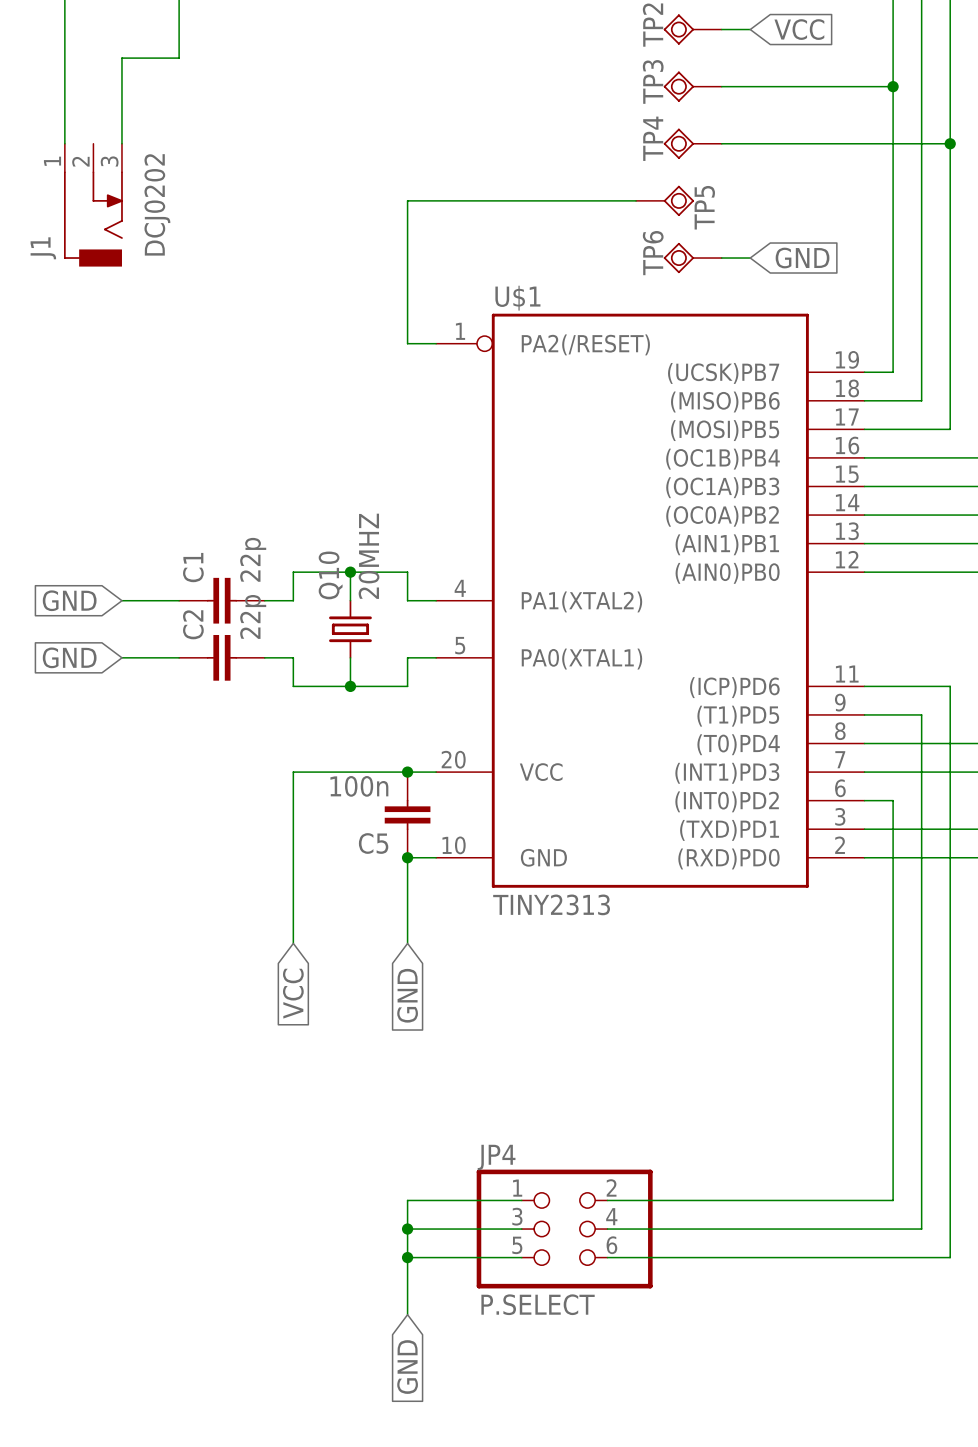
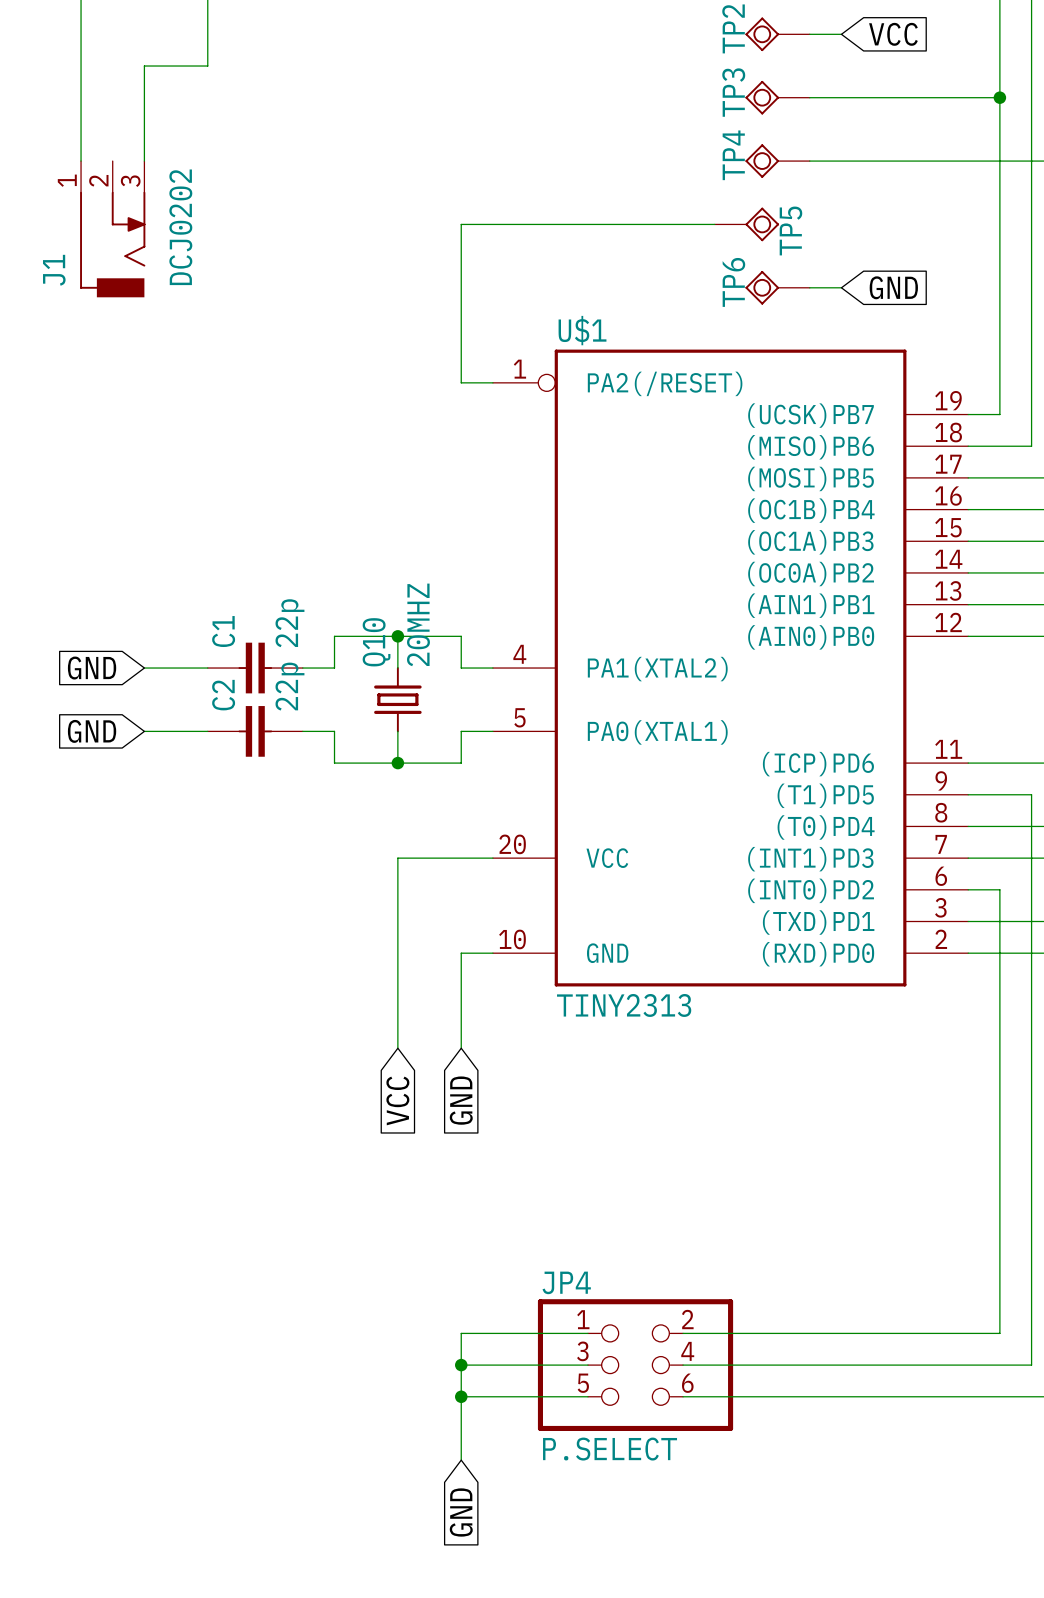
wire: (350, 772) (293, 772) (293, 943) -> (397, 858) (397, 1048)
junction: (407, 772) -> none
C5: 100n (407, 814) -> none
junction: (407, 857) -> none
global label position: VCC (293, 993) -> VCC (397, 1100)

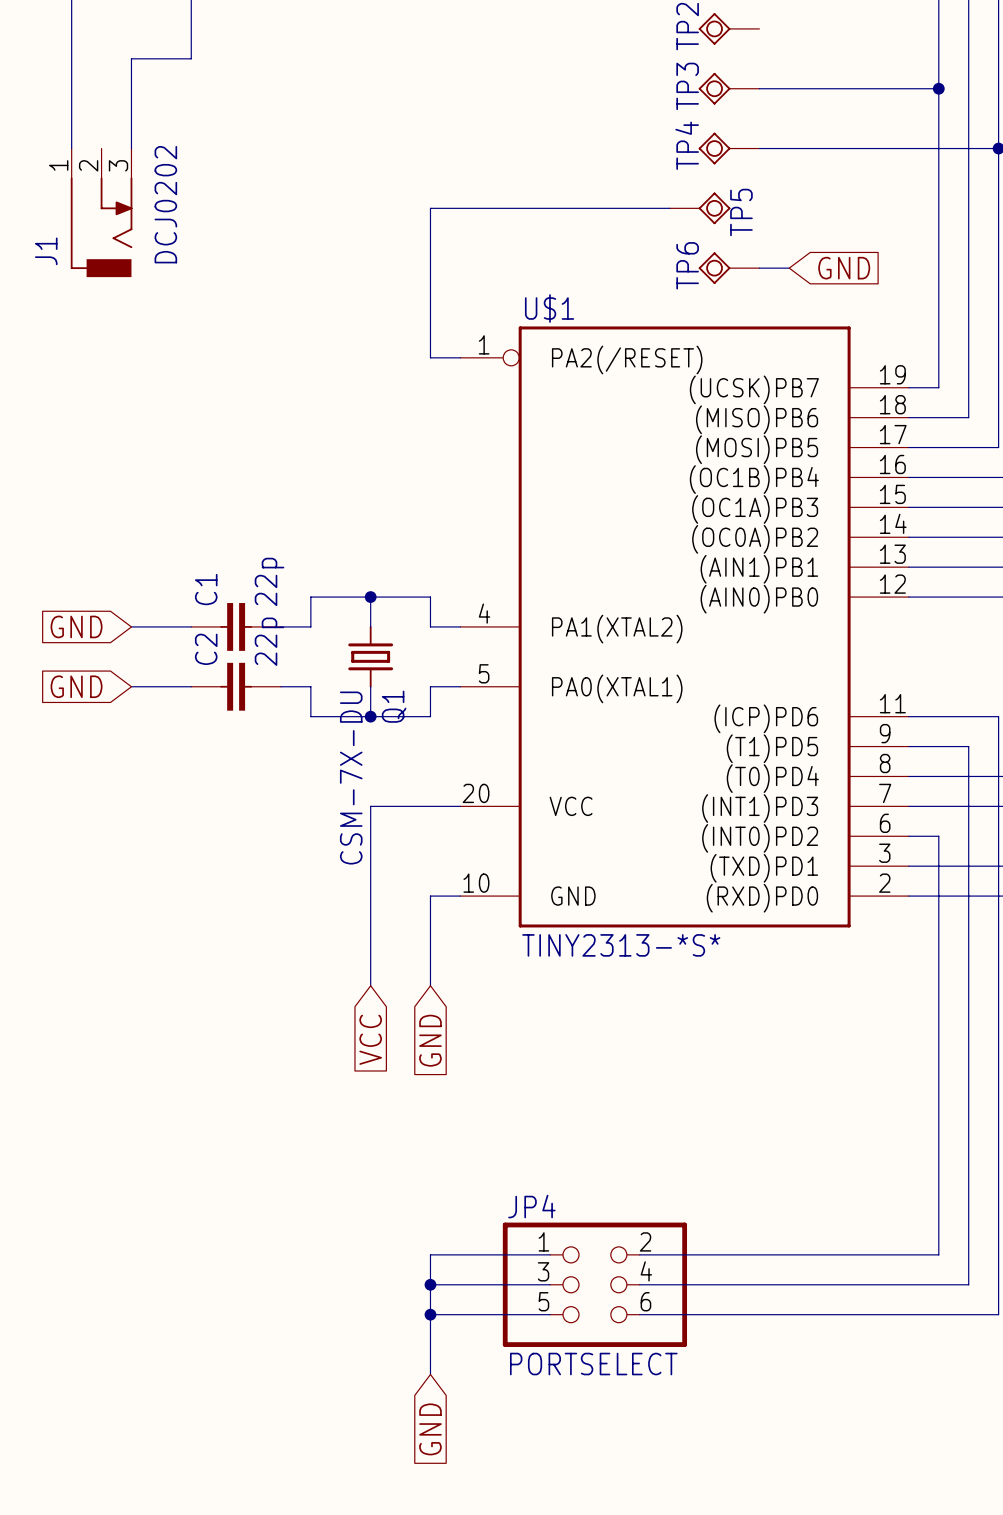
wire: (809, 34) (841, 34) -> none
global label: VCC (893, 34) -> none
Q10 value: 20MHZ (418, 624) -> CSM-7X-DU (351, 778)
Q10 name: Q10 (376, 642) -> Q1 (394, 706)
U$1 value: TINY2313 (624, 1005) -> TINY2313-*S* (621, 945)
JP4 value: P.SELECT (610, 1449) -> PORTSELECT (593, 1364)

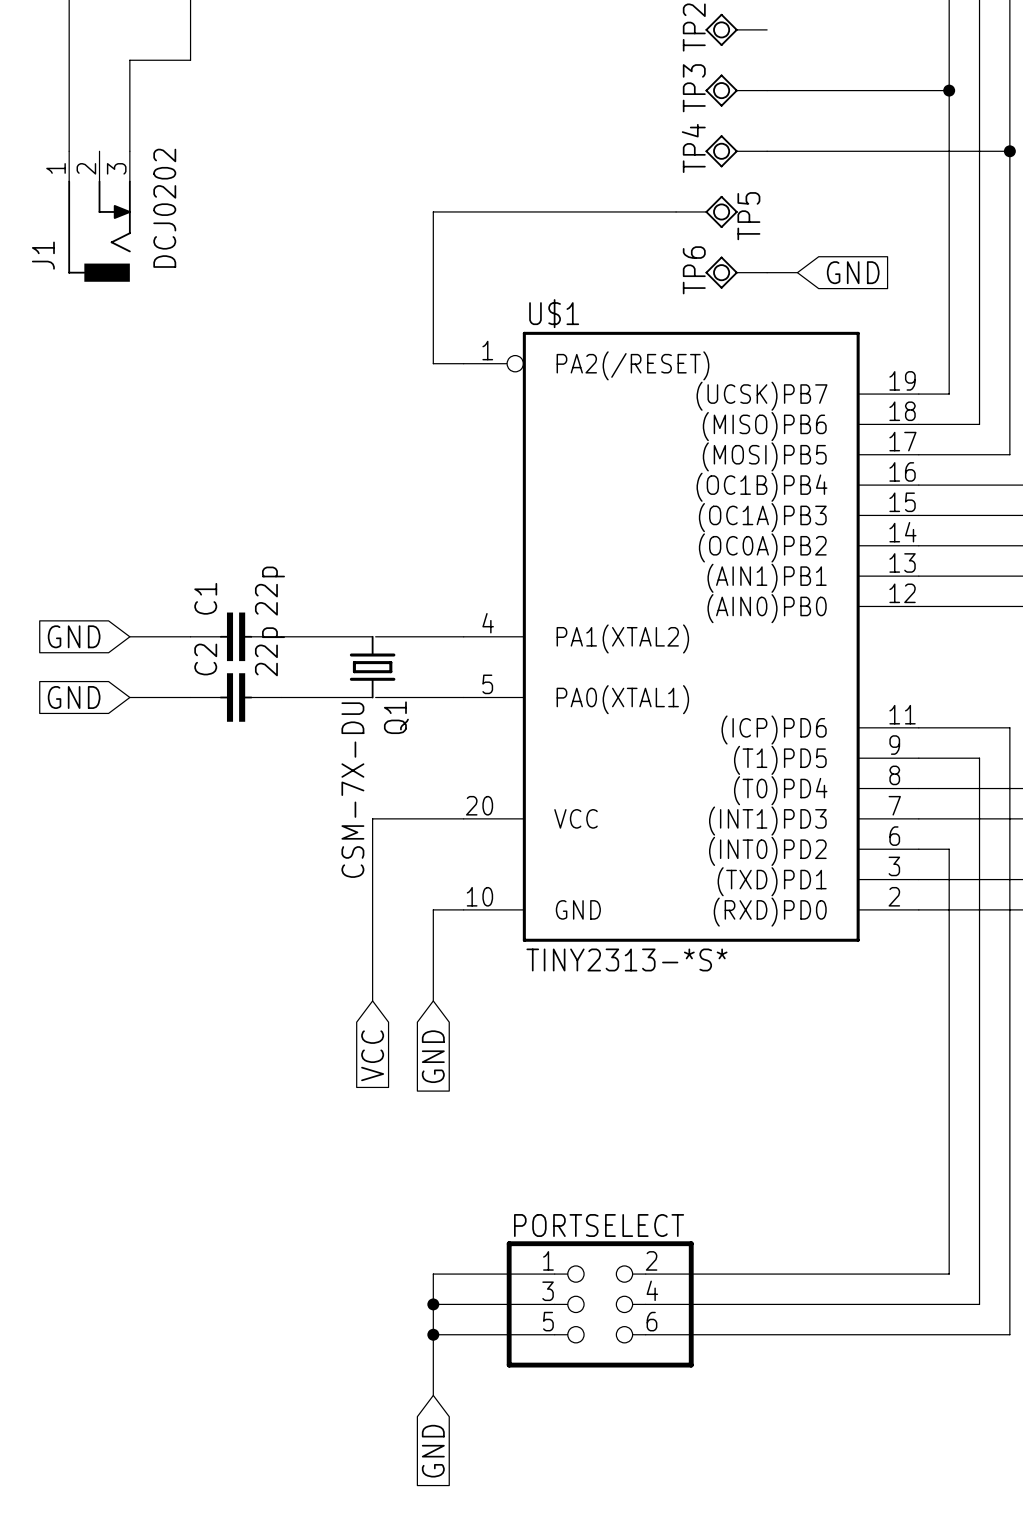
wire: (370, 597) (370, 626) -> none
junction: (370, 597) -> none
wire: (310, 626) (310, 597) (430, 597) (430, 626) -> (311, 636) (372, 636)
wire: none -> (375, 636) (433, 636)
wire: (310, 686) (310, 716) (430, 716) (430, 686) -> (311, 697) (372, 697)
wire: (370, 686) (370, 716) -> none
wire: none -> (375, 697) (433, 697)
junction: (370, 716) -> none
JP4 name: JP4 (531, 1206) -> PORTSELECT (599, 1225)
JP4 value: PORTSELECT (593, 1364) -> none

